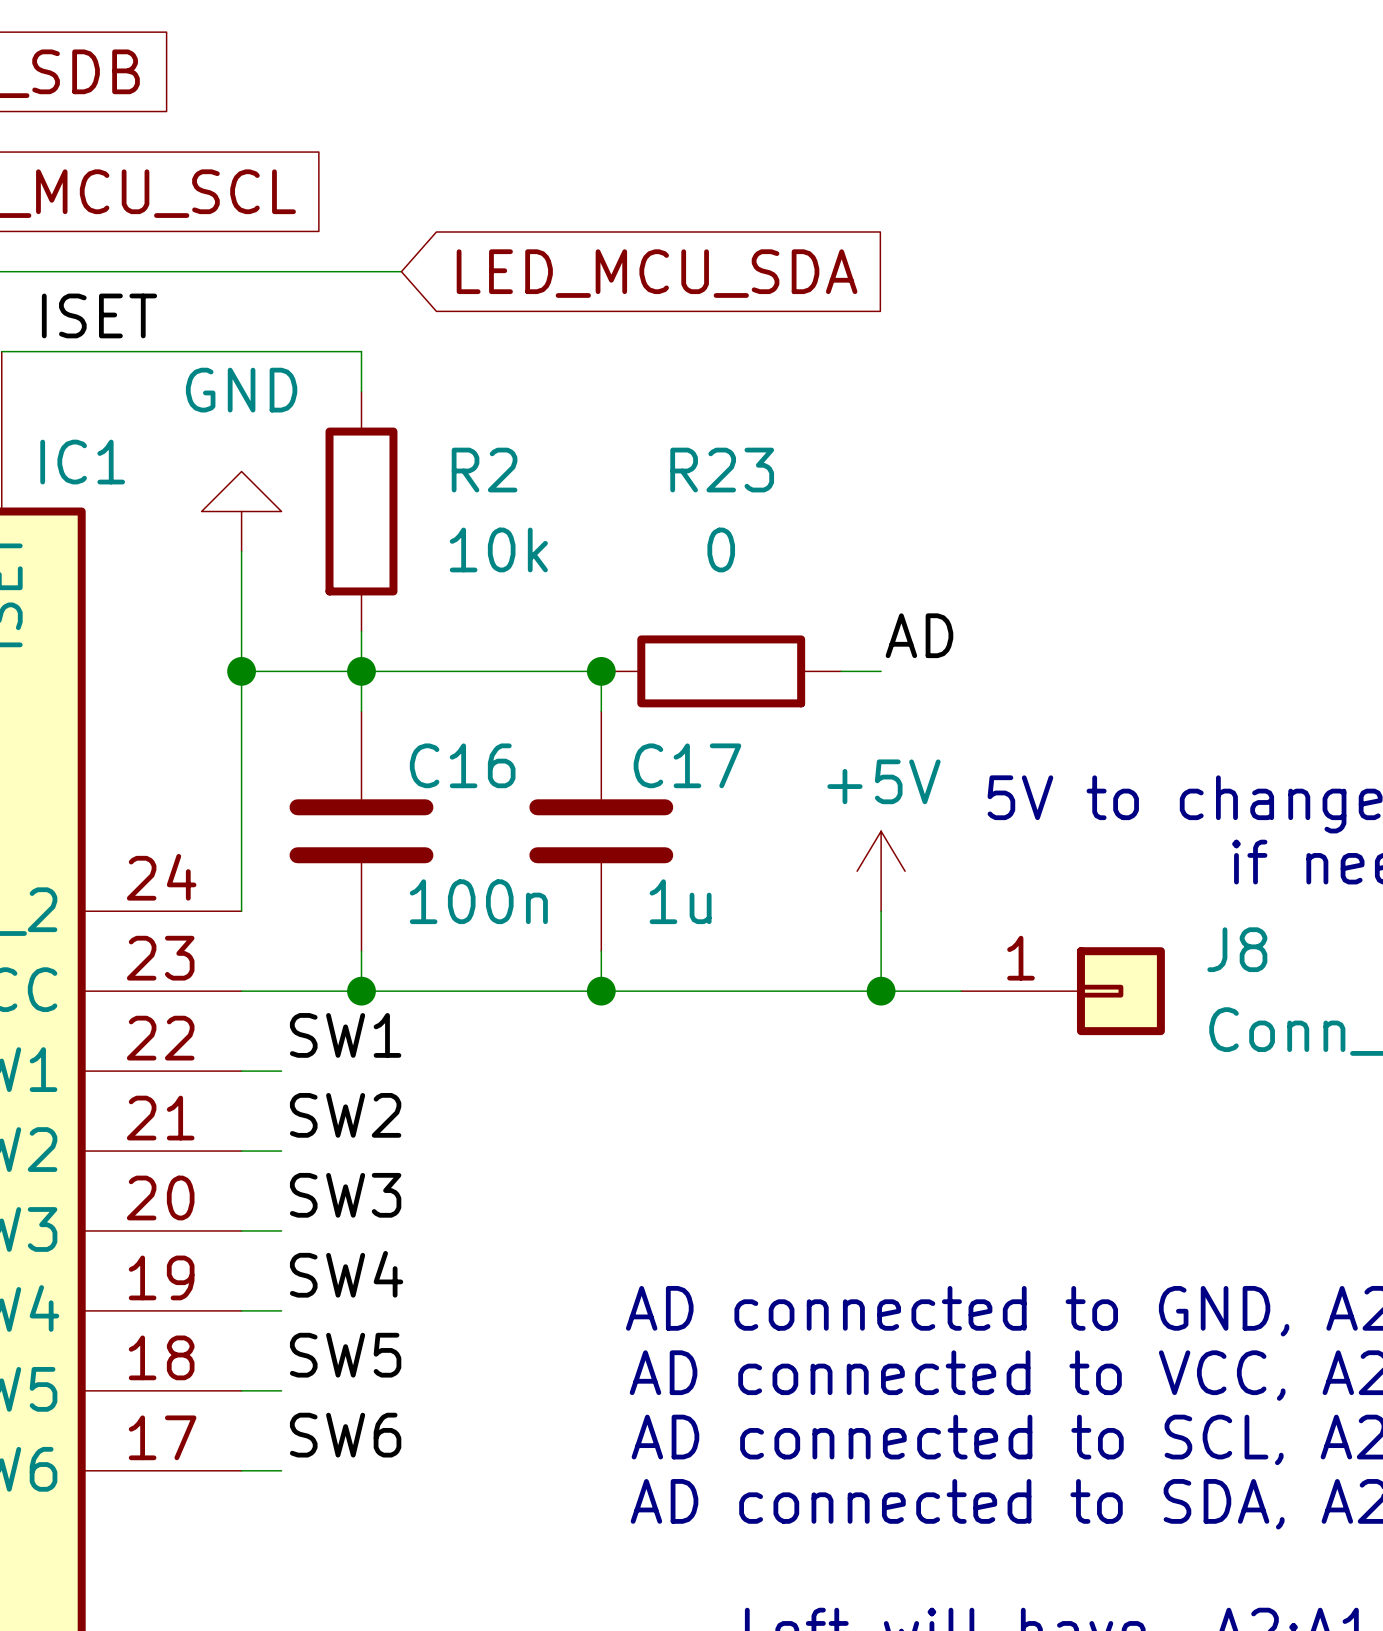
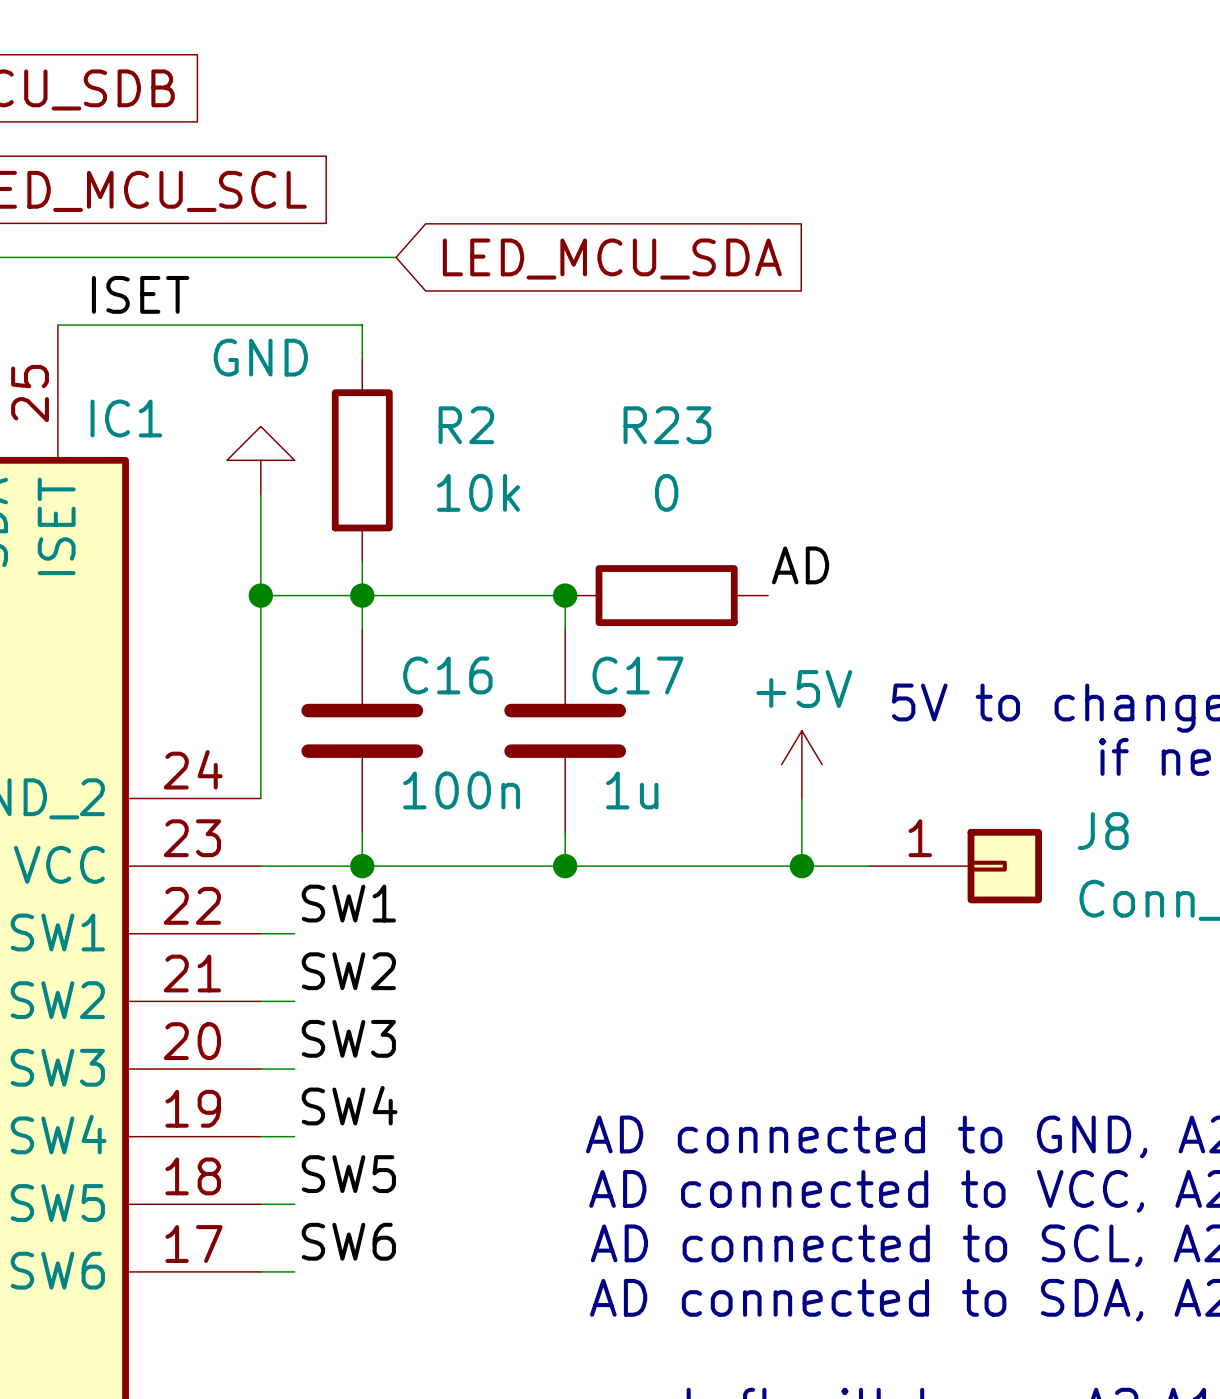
label position: AD (919, 635) -> AD (800, 565)
wire: (841, 671) (881, 671) -> none

